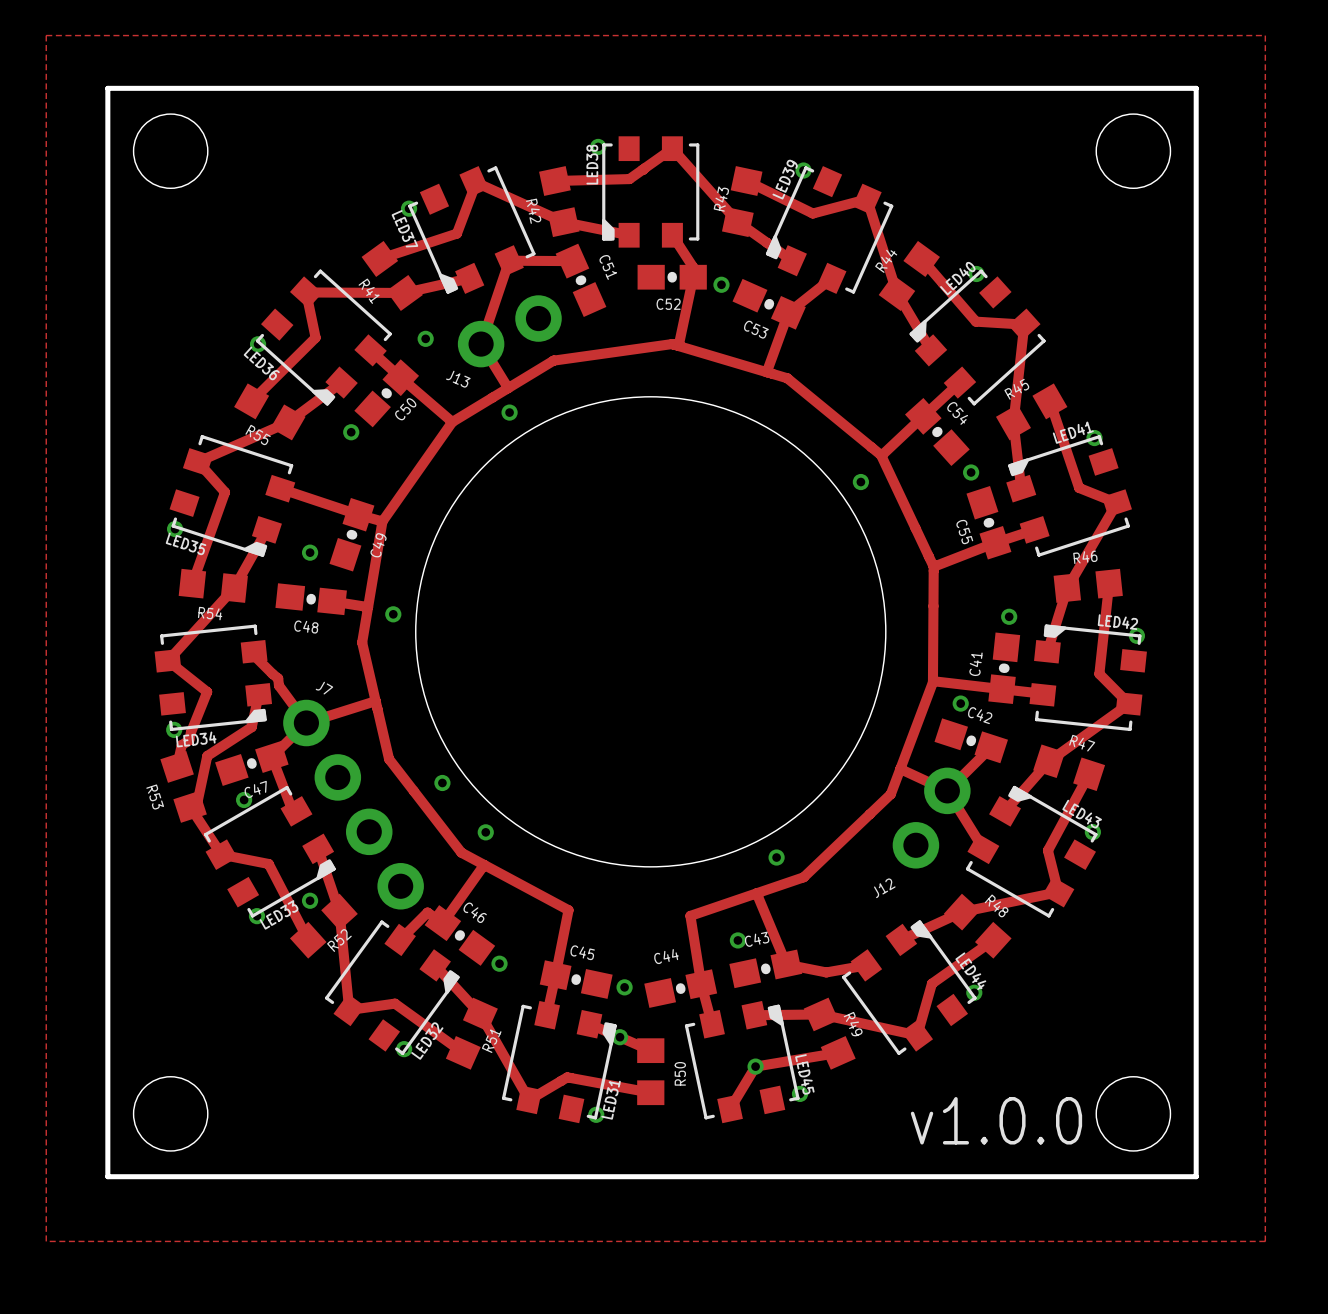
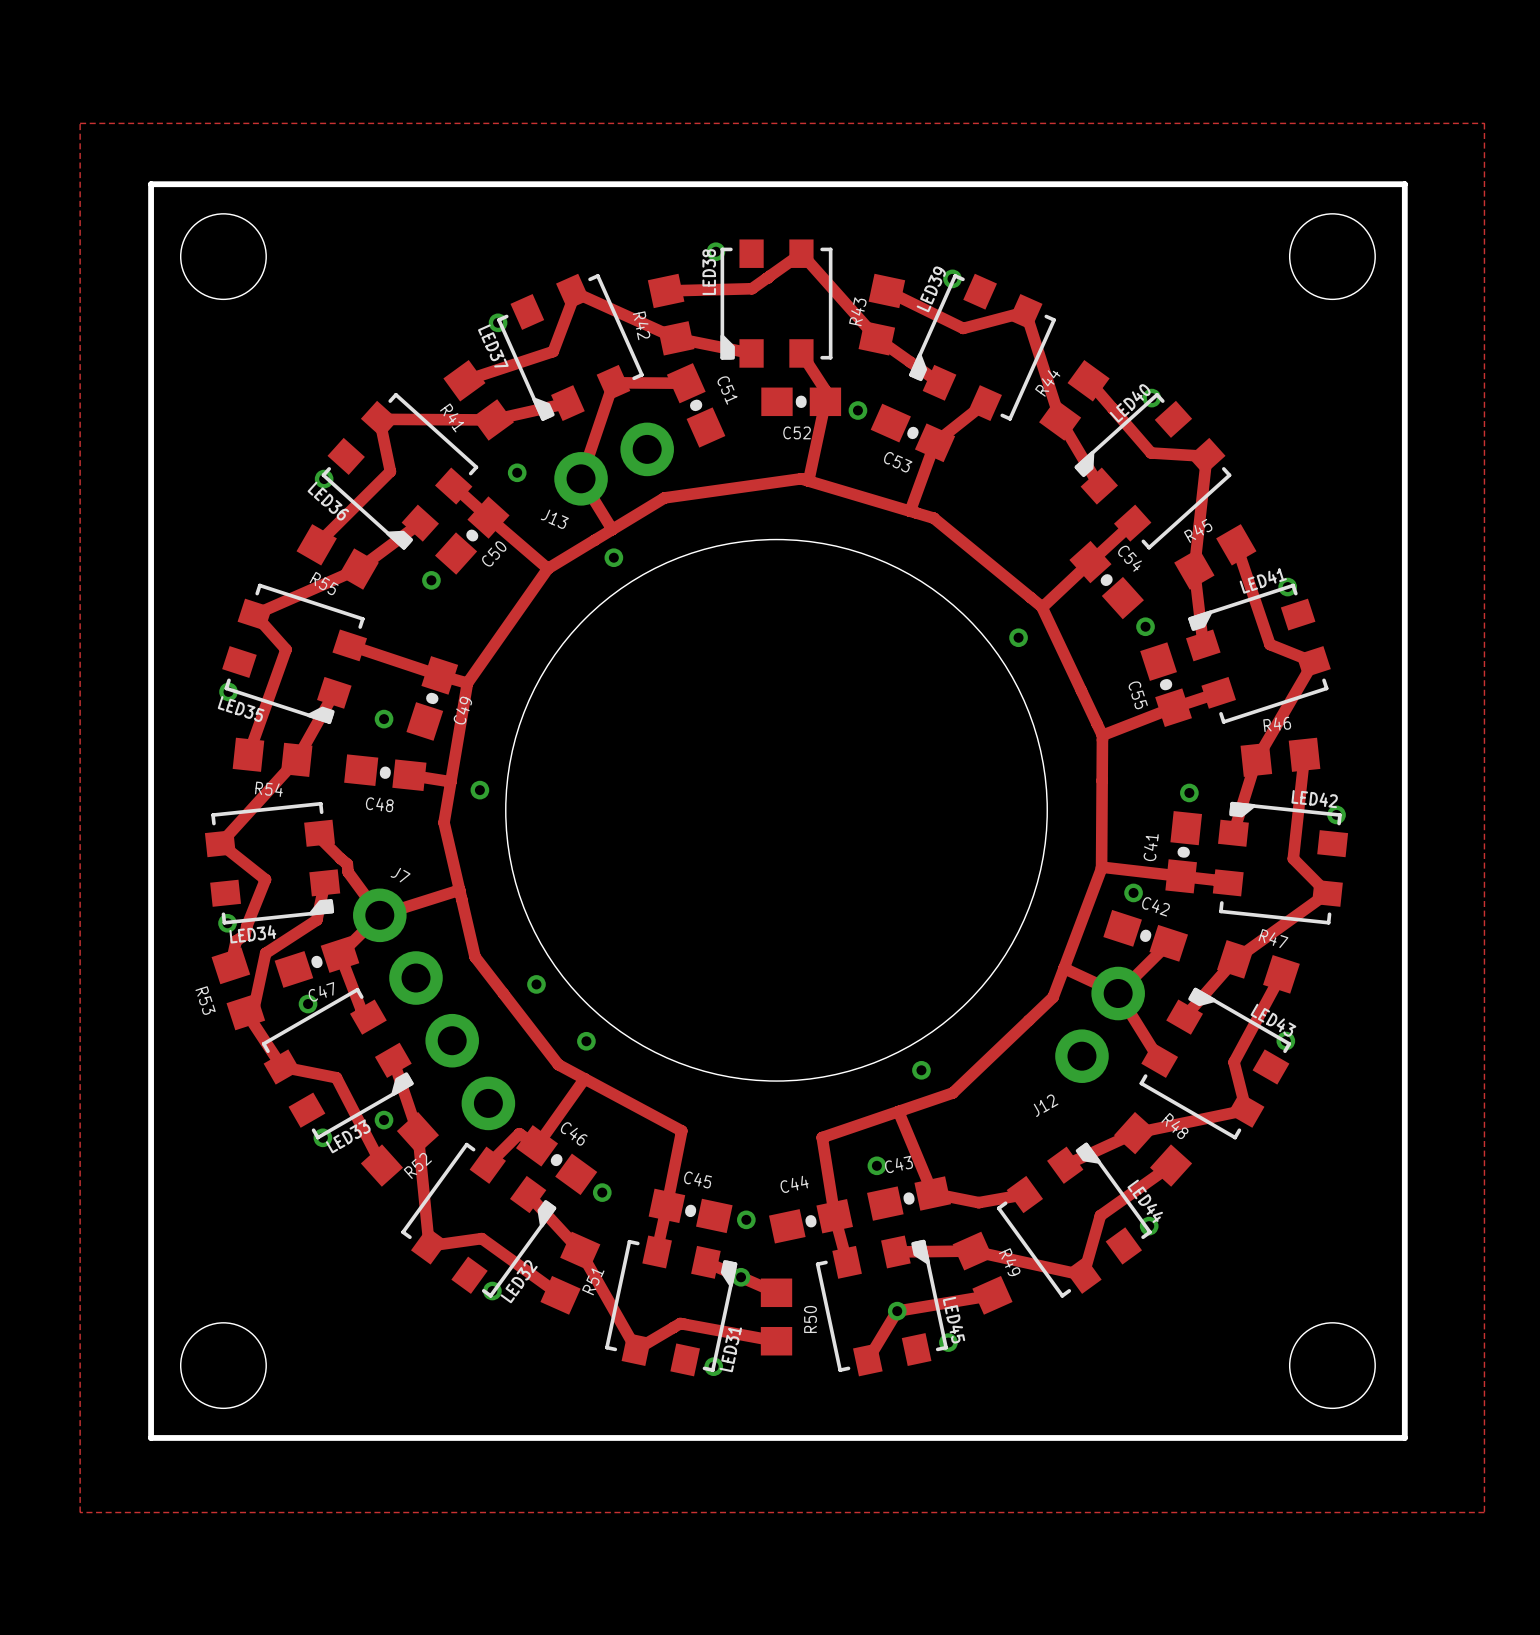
text: v1.0.0 (996, 1120) -> none

